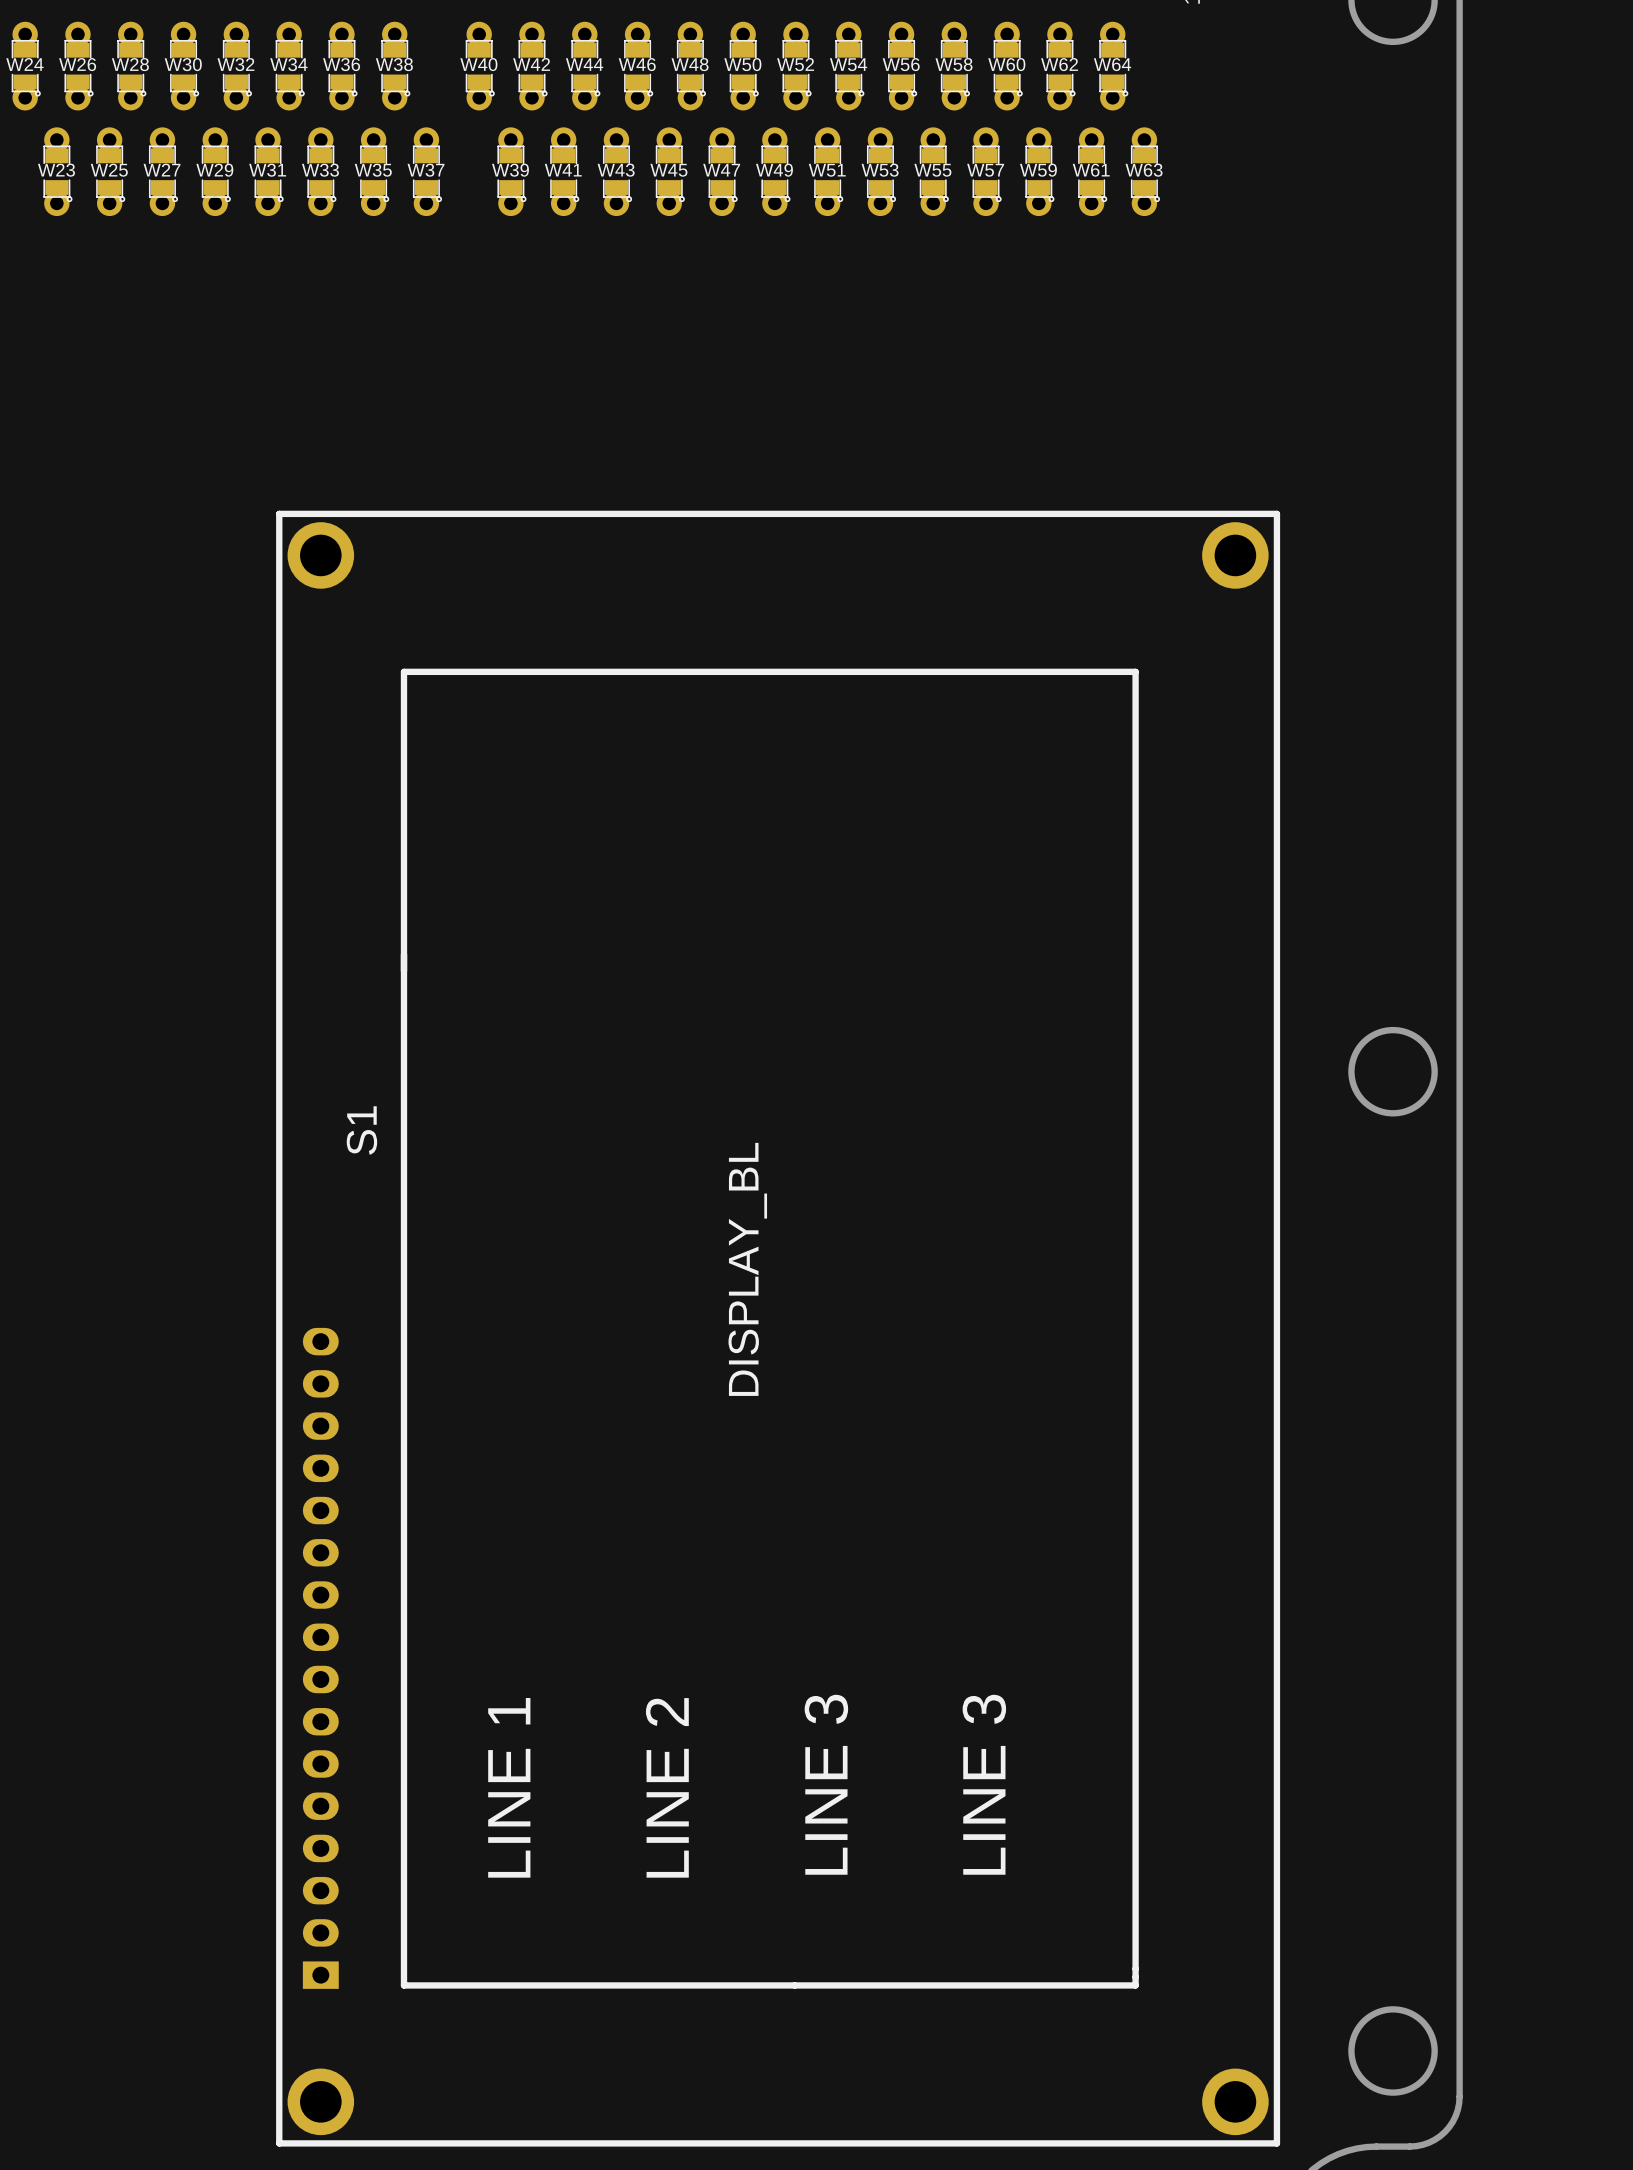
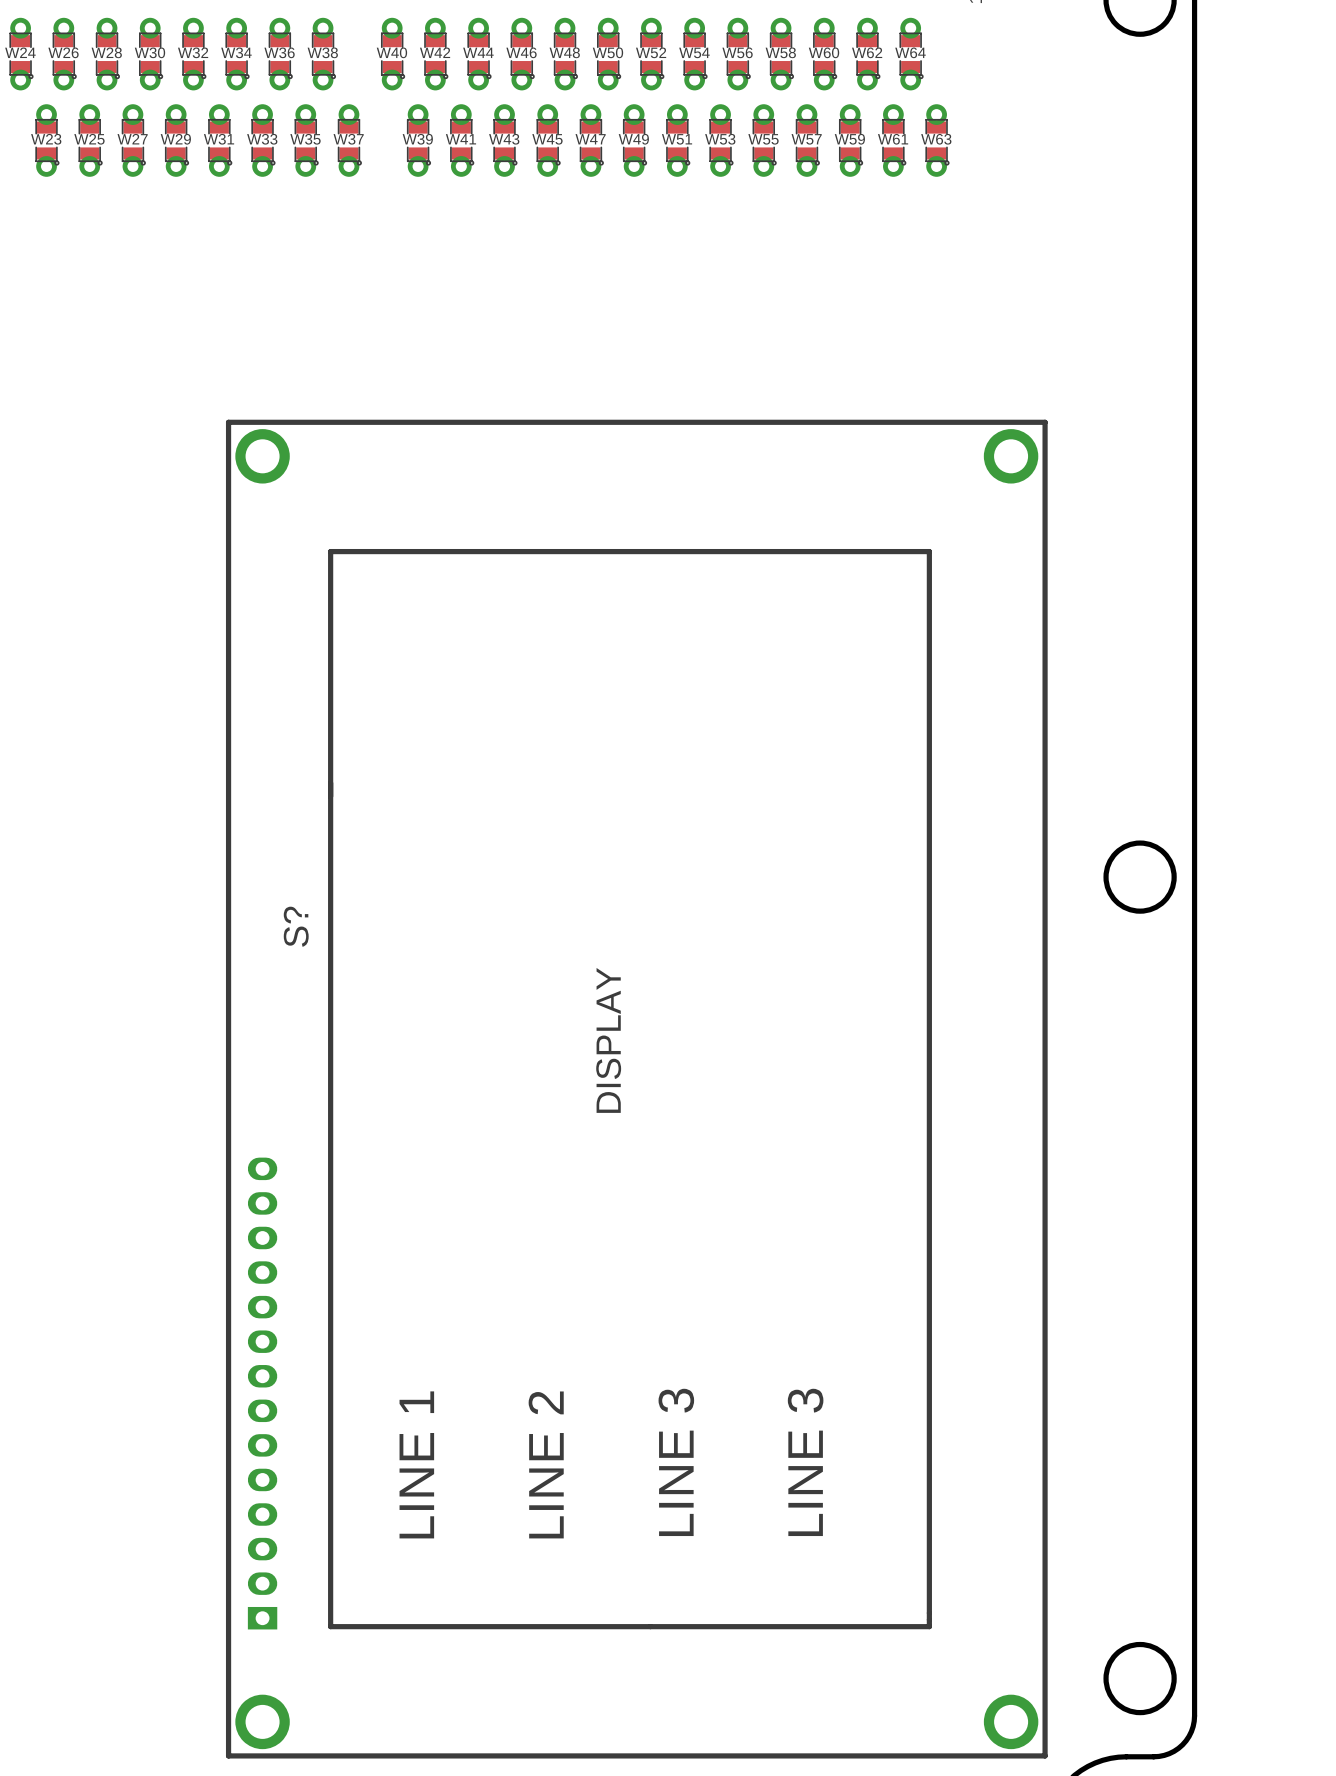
S1: DISPLAY_BL (778, 1328) -> none
S?: none -> DISPLAY (636, 1089)

